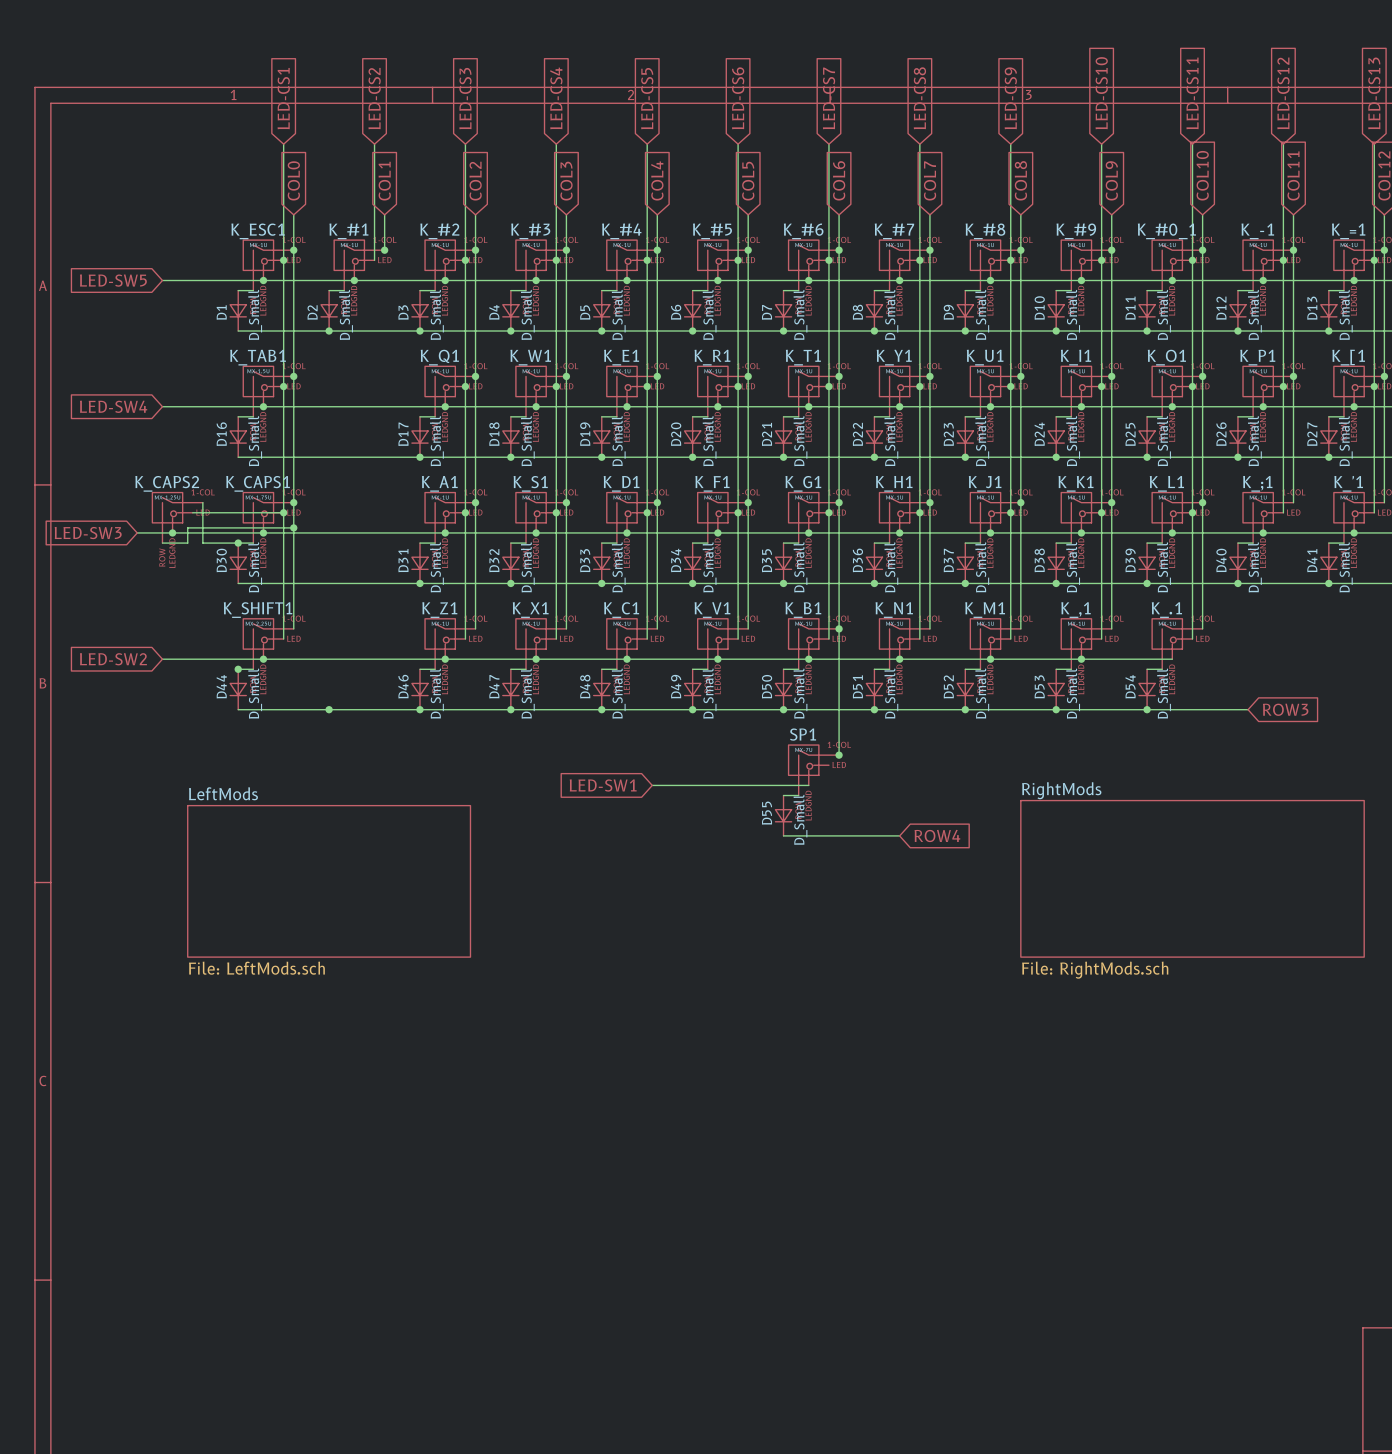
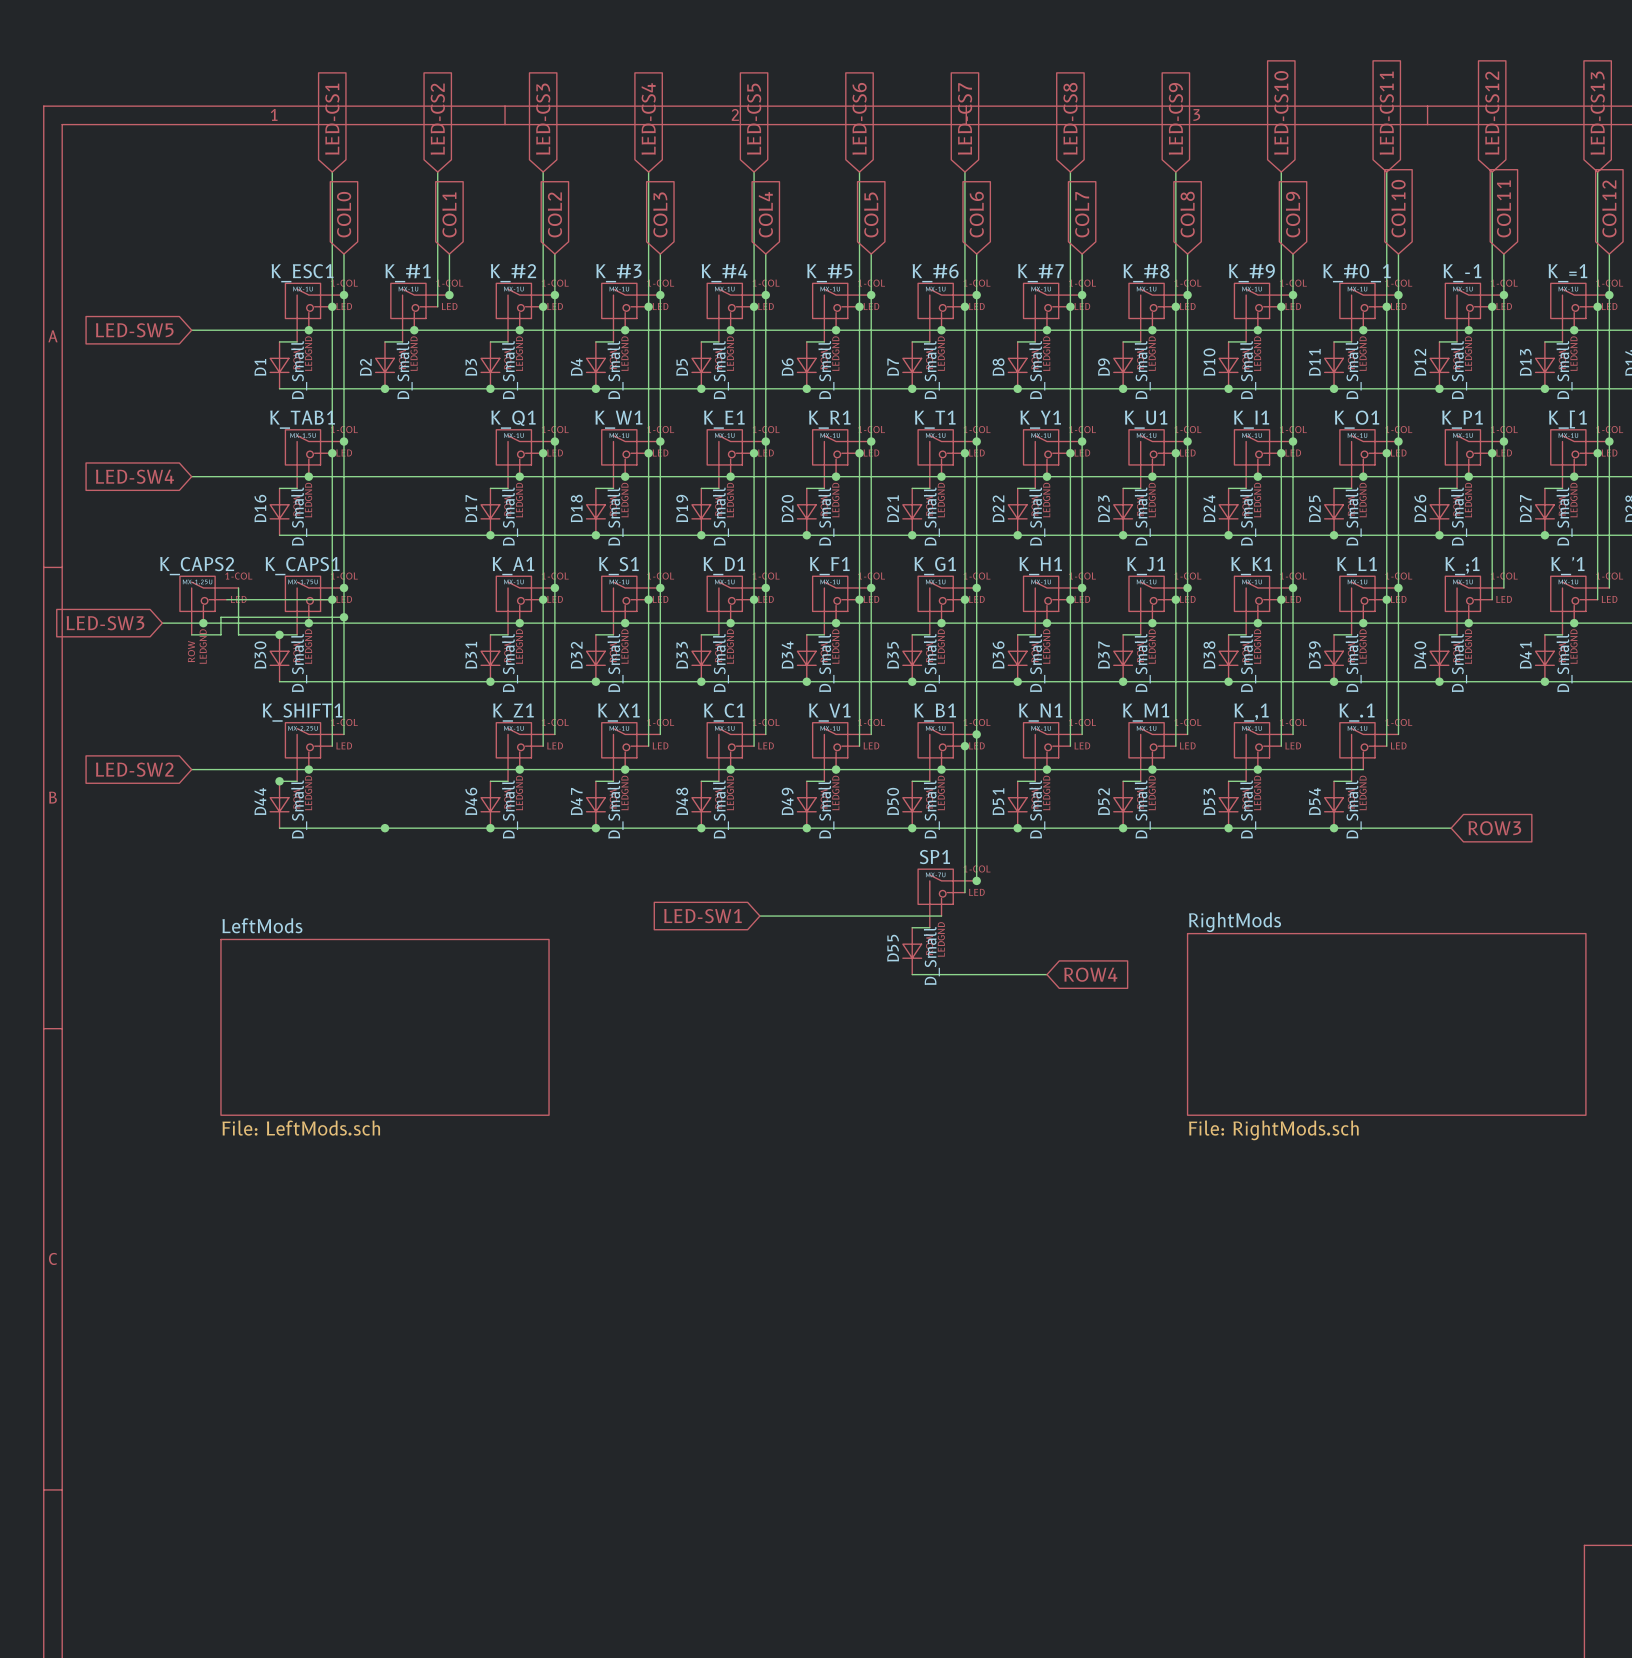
wire: none -> (964, 746) (964, 892)
junction: none -> (964, 746)

